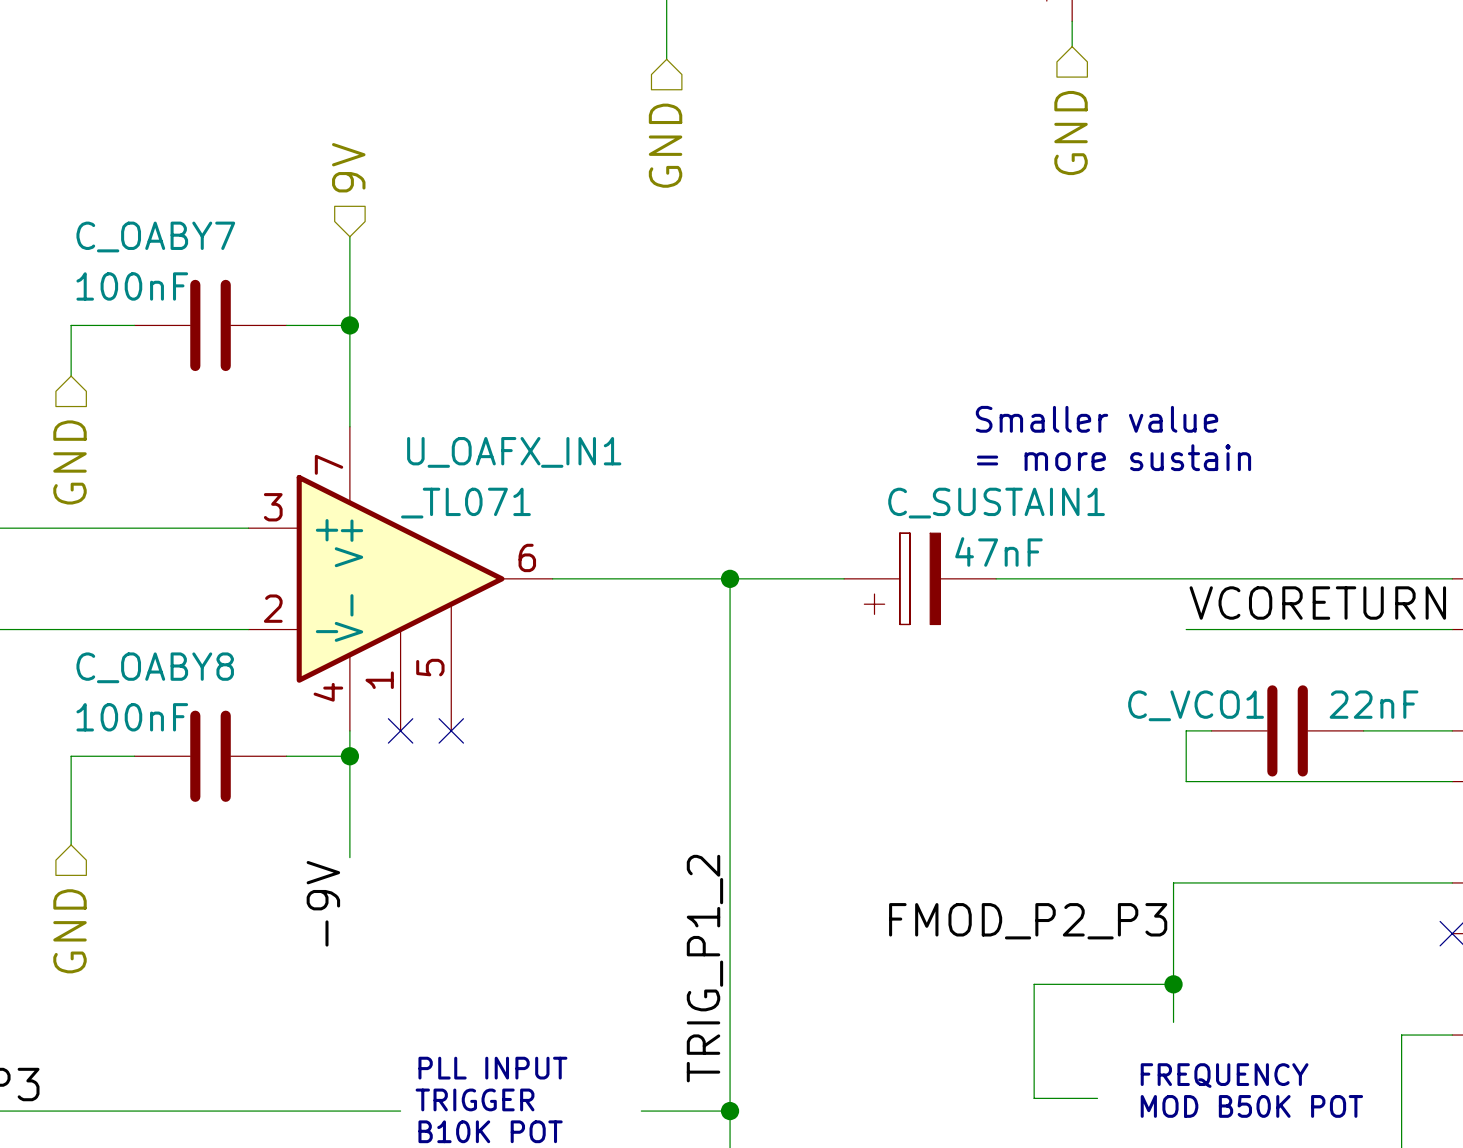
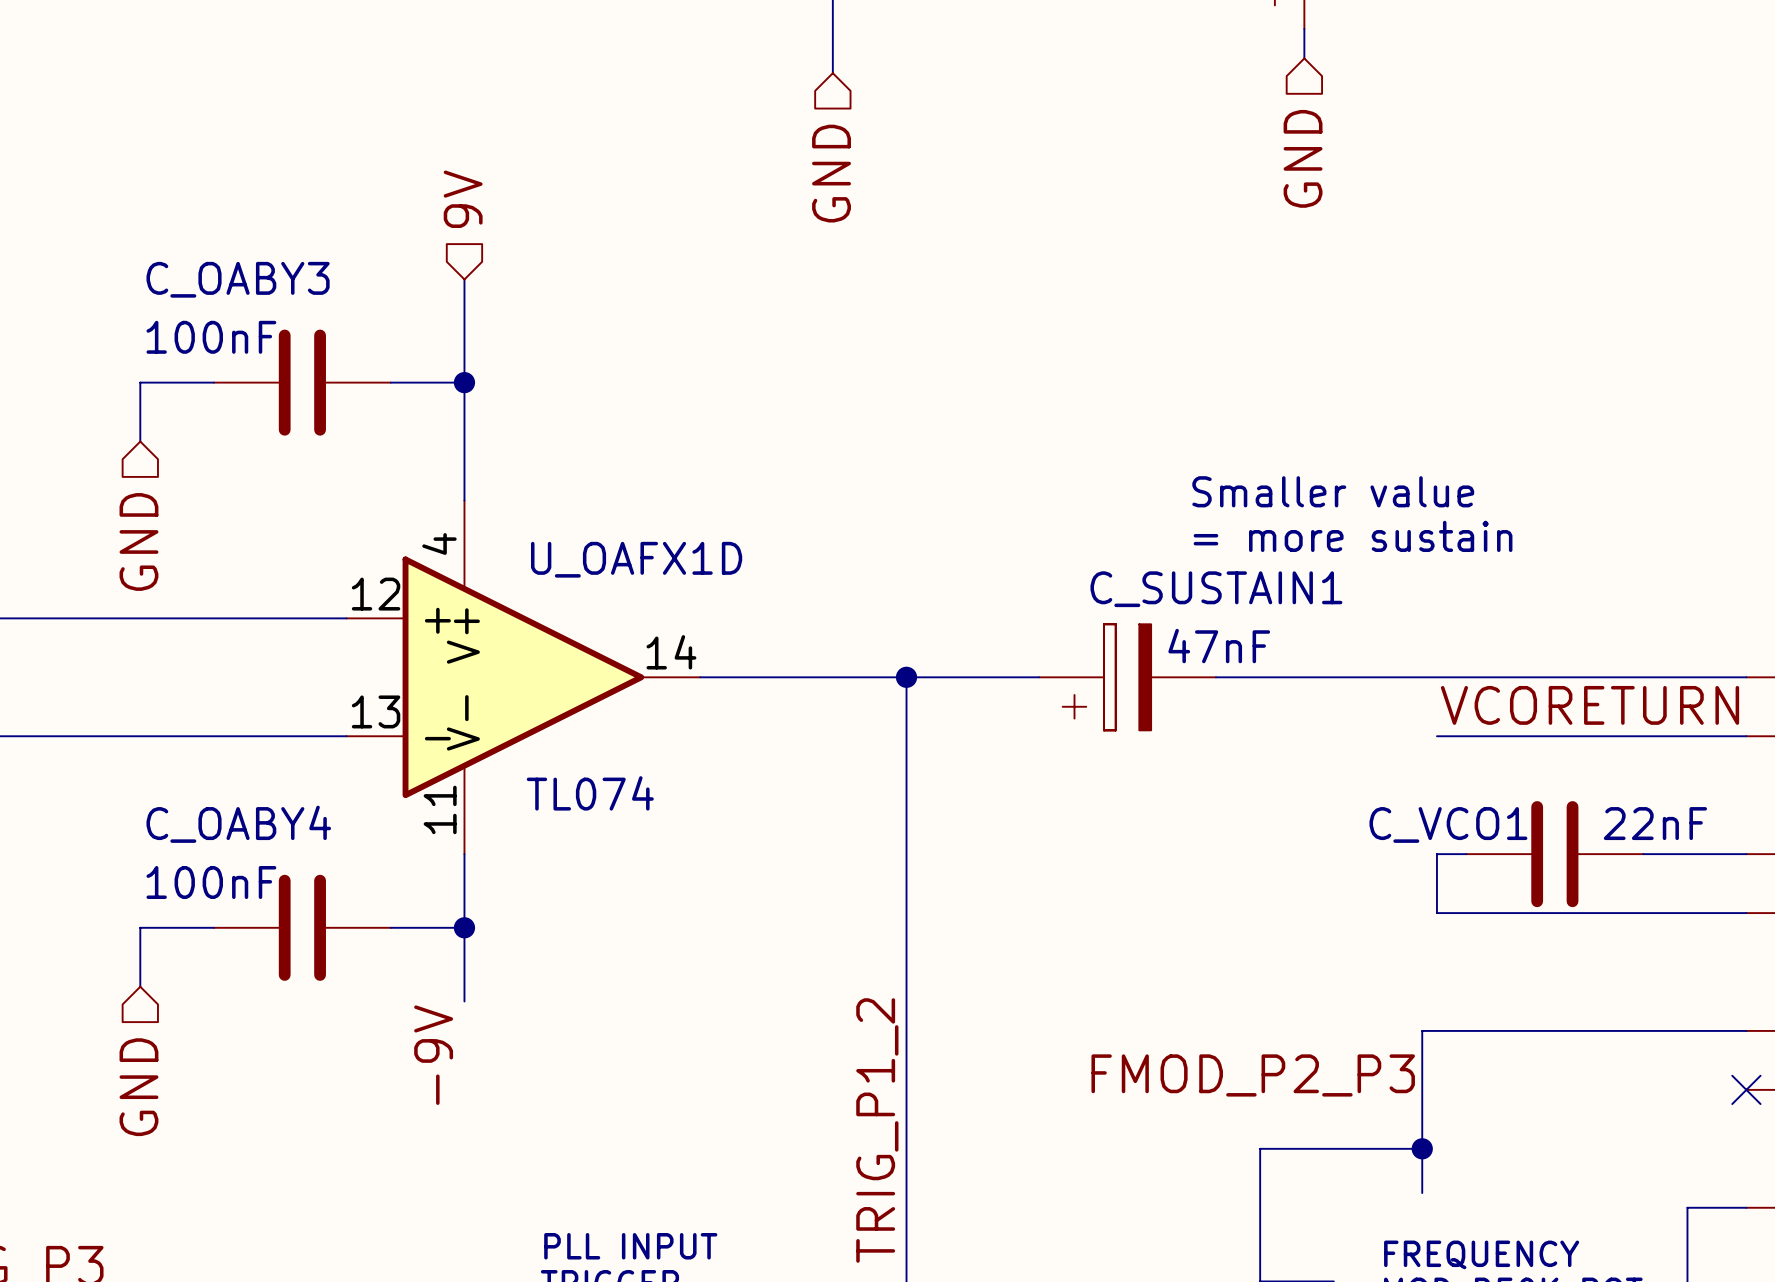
C_OABY7 name: C_OABY7 (155, 236) -> C_OABY3 (238, 279)
U_OAFX_IN1: _TL071 (400, 578) -> none
U_OAFX1D: none -> TL074 (523, 677)
no-connect mark: (400, 730) -> none
no-connect mark: (451, 730) -> none
wire: (134, 756) (71, 756) (71, 794) -> (213, 927) (140, 927)
C_OABY8: 100nF (210, 756) -> none
wire: (286, 756) (349, 756) -> (390, 927) (464, 927)
junction position: (349, 756) -> (464, 927)
C_OABY4: none -> 100nF (302, 927)

